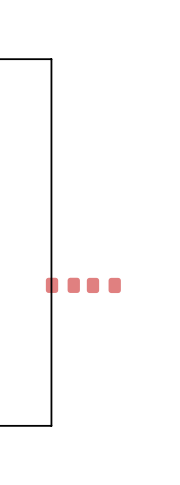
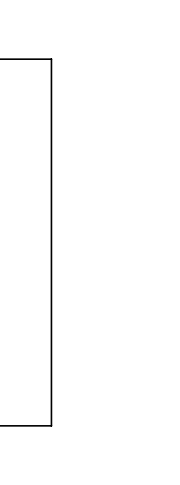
part: (62, 285) -> none
part: (103, 285) -> none

